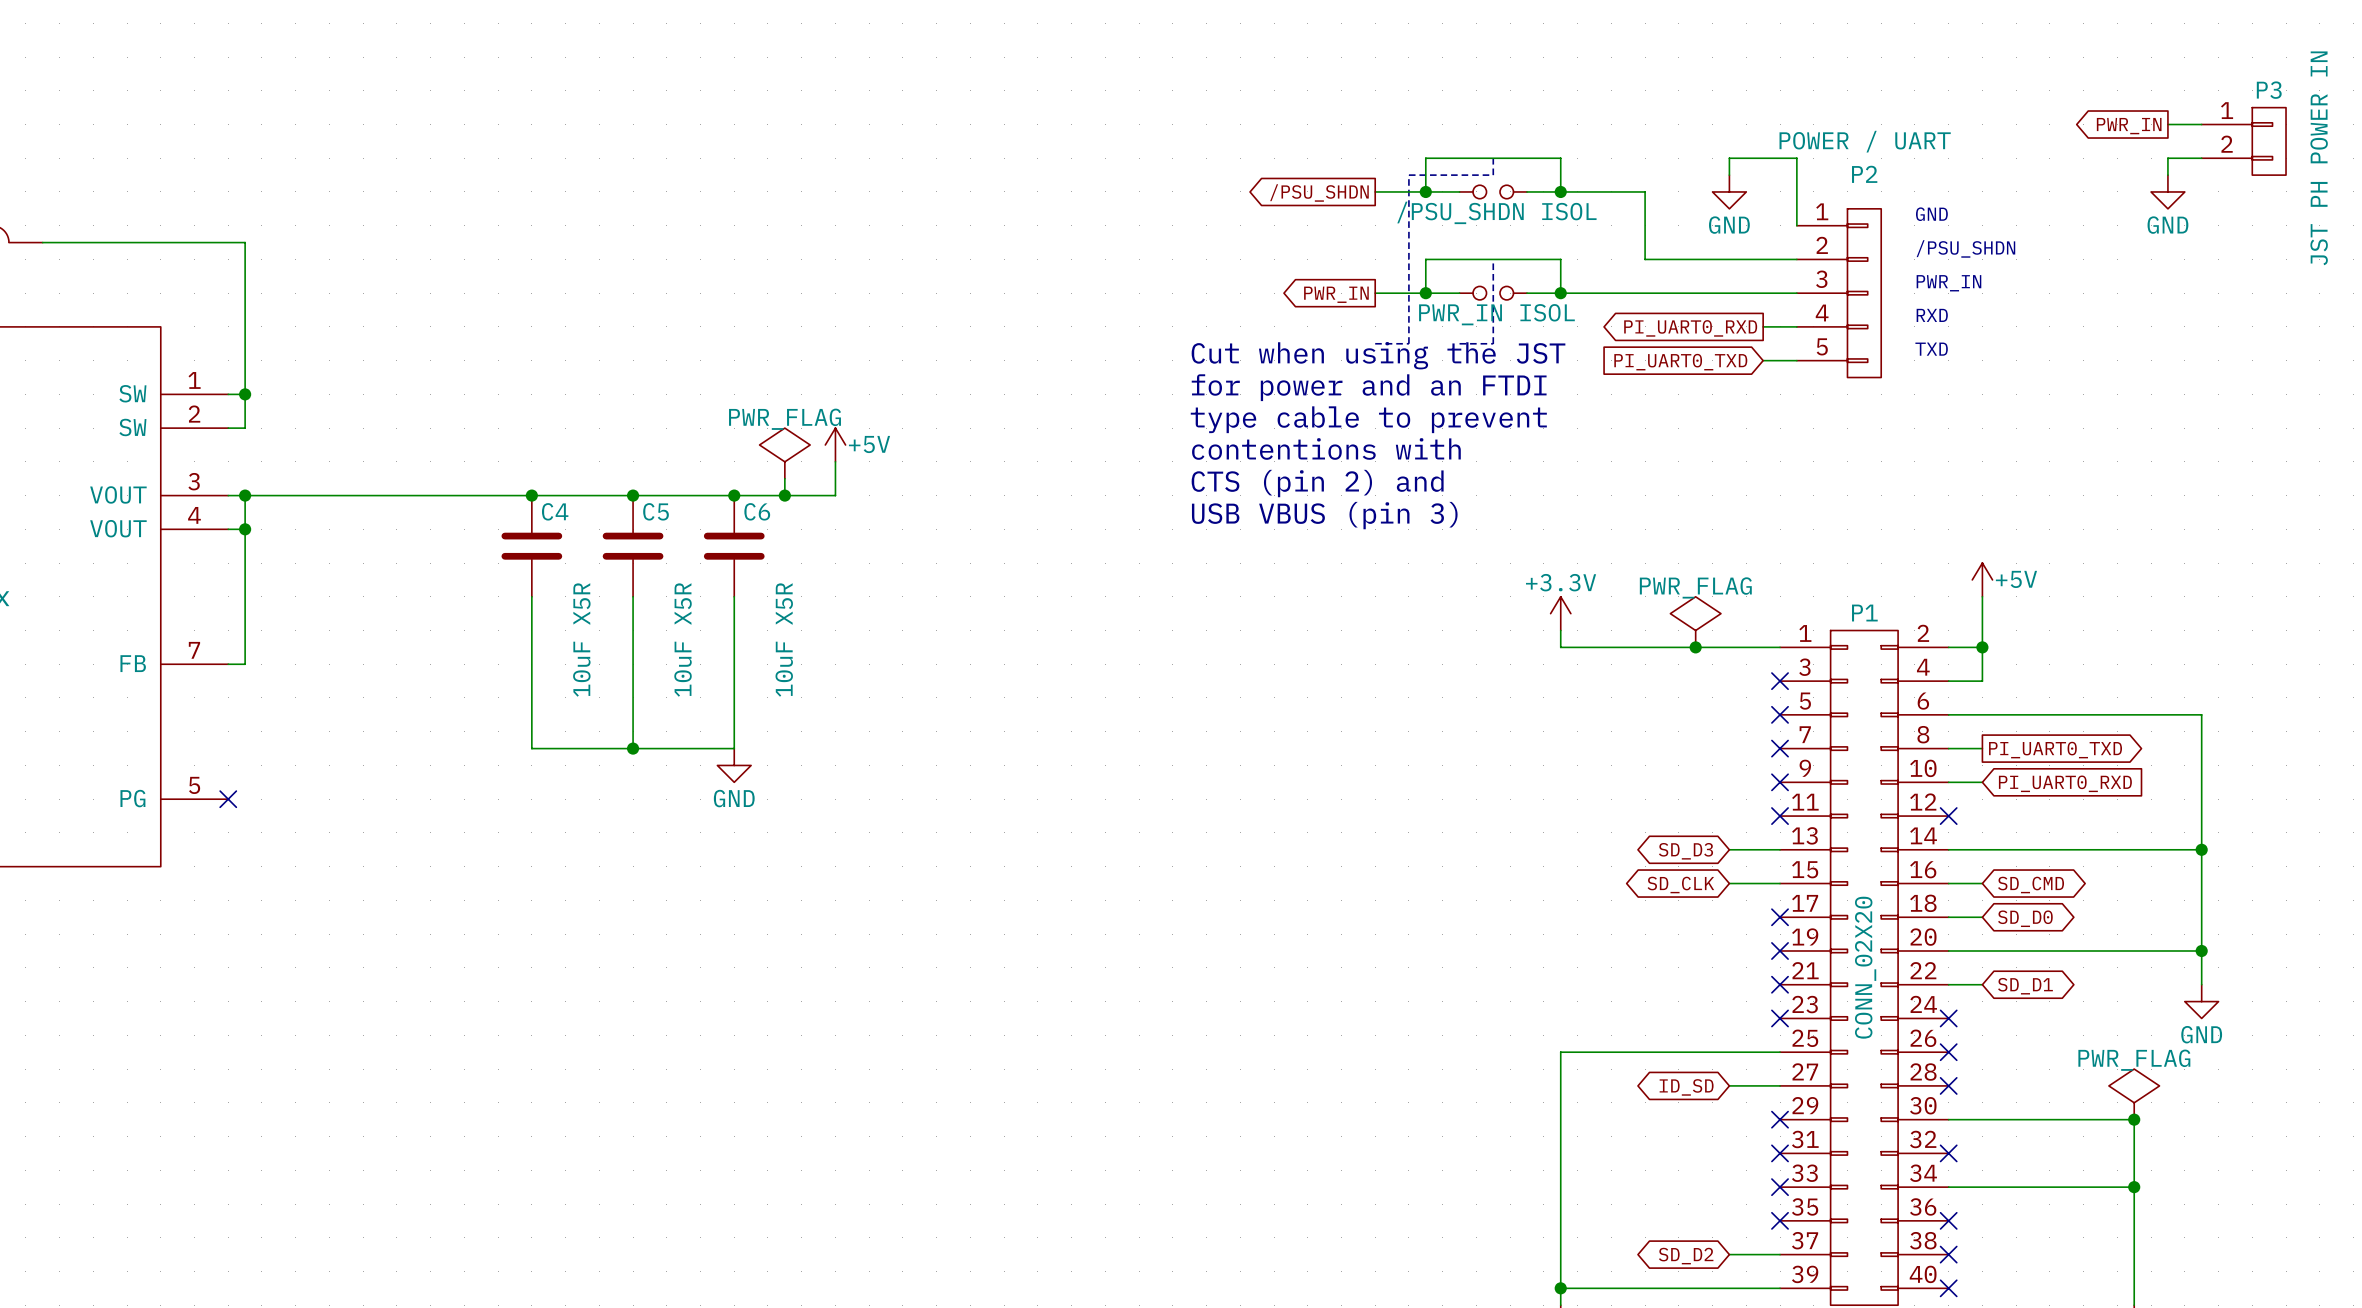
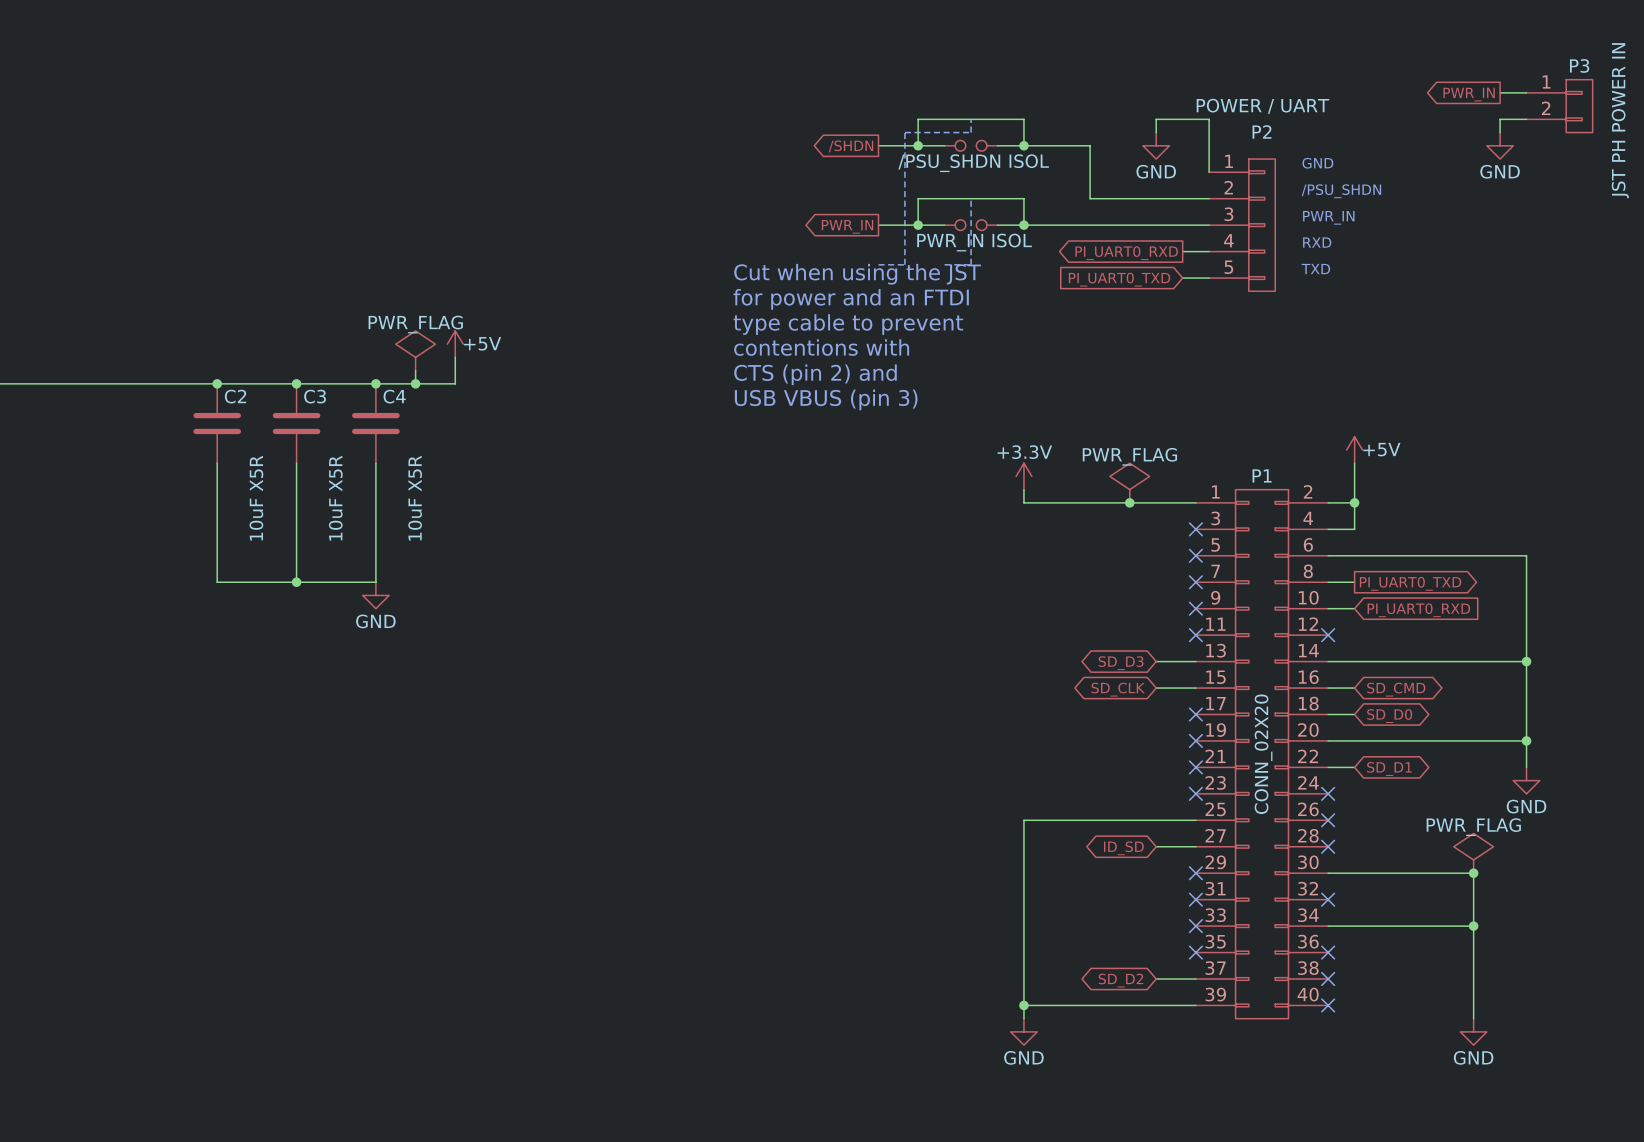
global label: /PSU_SHDN (1319, 192) -> /SHDN (850, 146)
C4 name: C4 (555, 511) -> C2 (235, 396)
C5 name: C5 (656, 511) -> C3 (315, 396)
C6 name: C6 (757, 511) -> C4 (394, 396)

